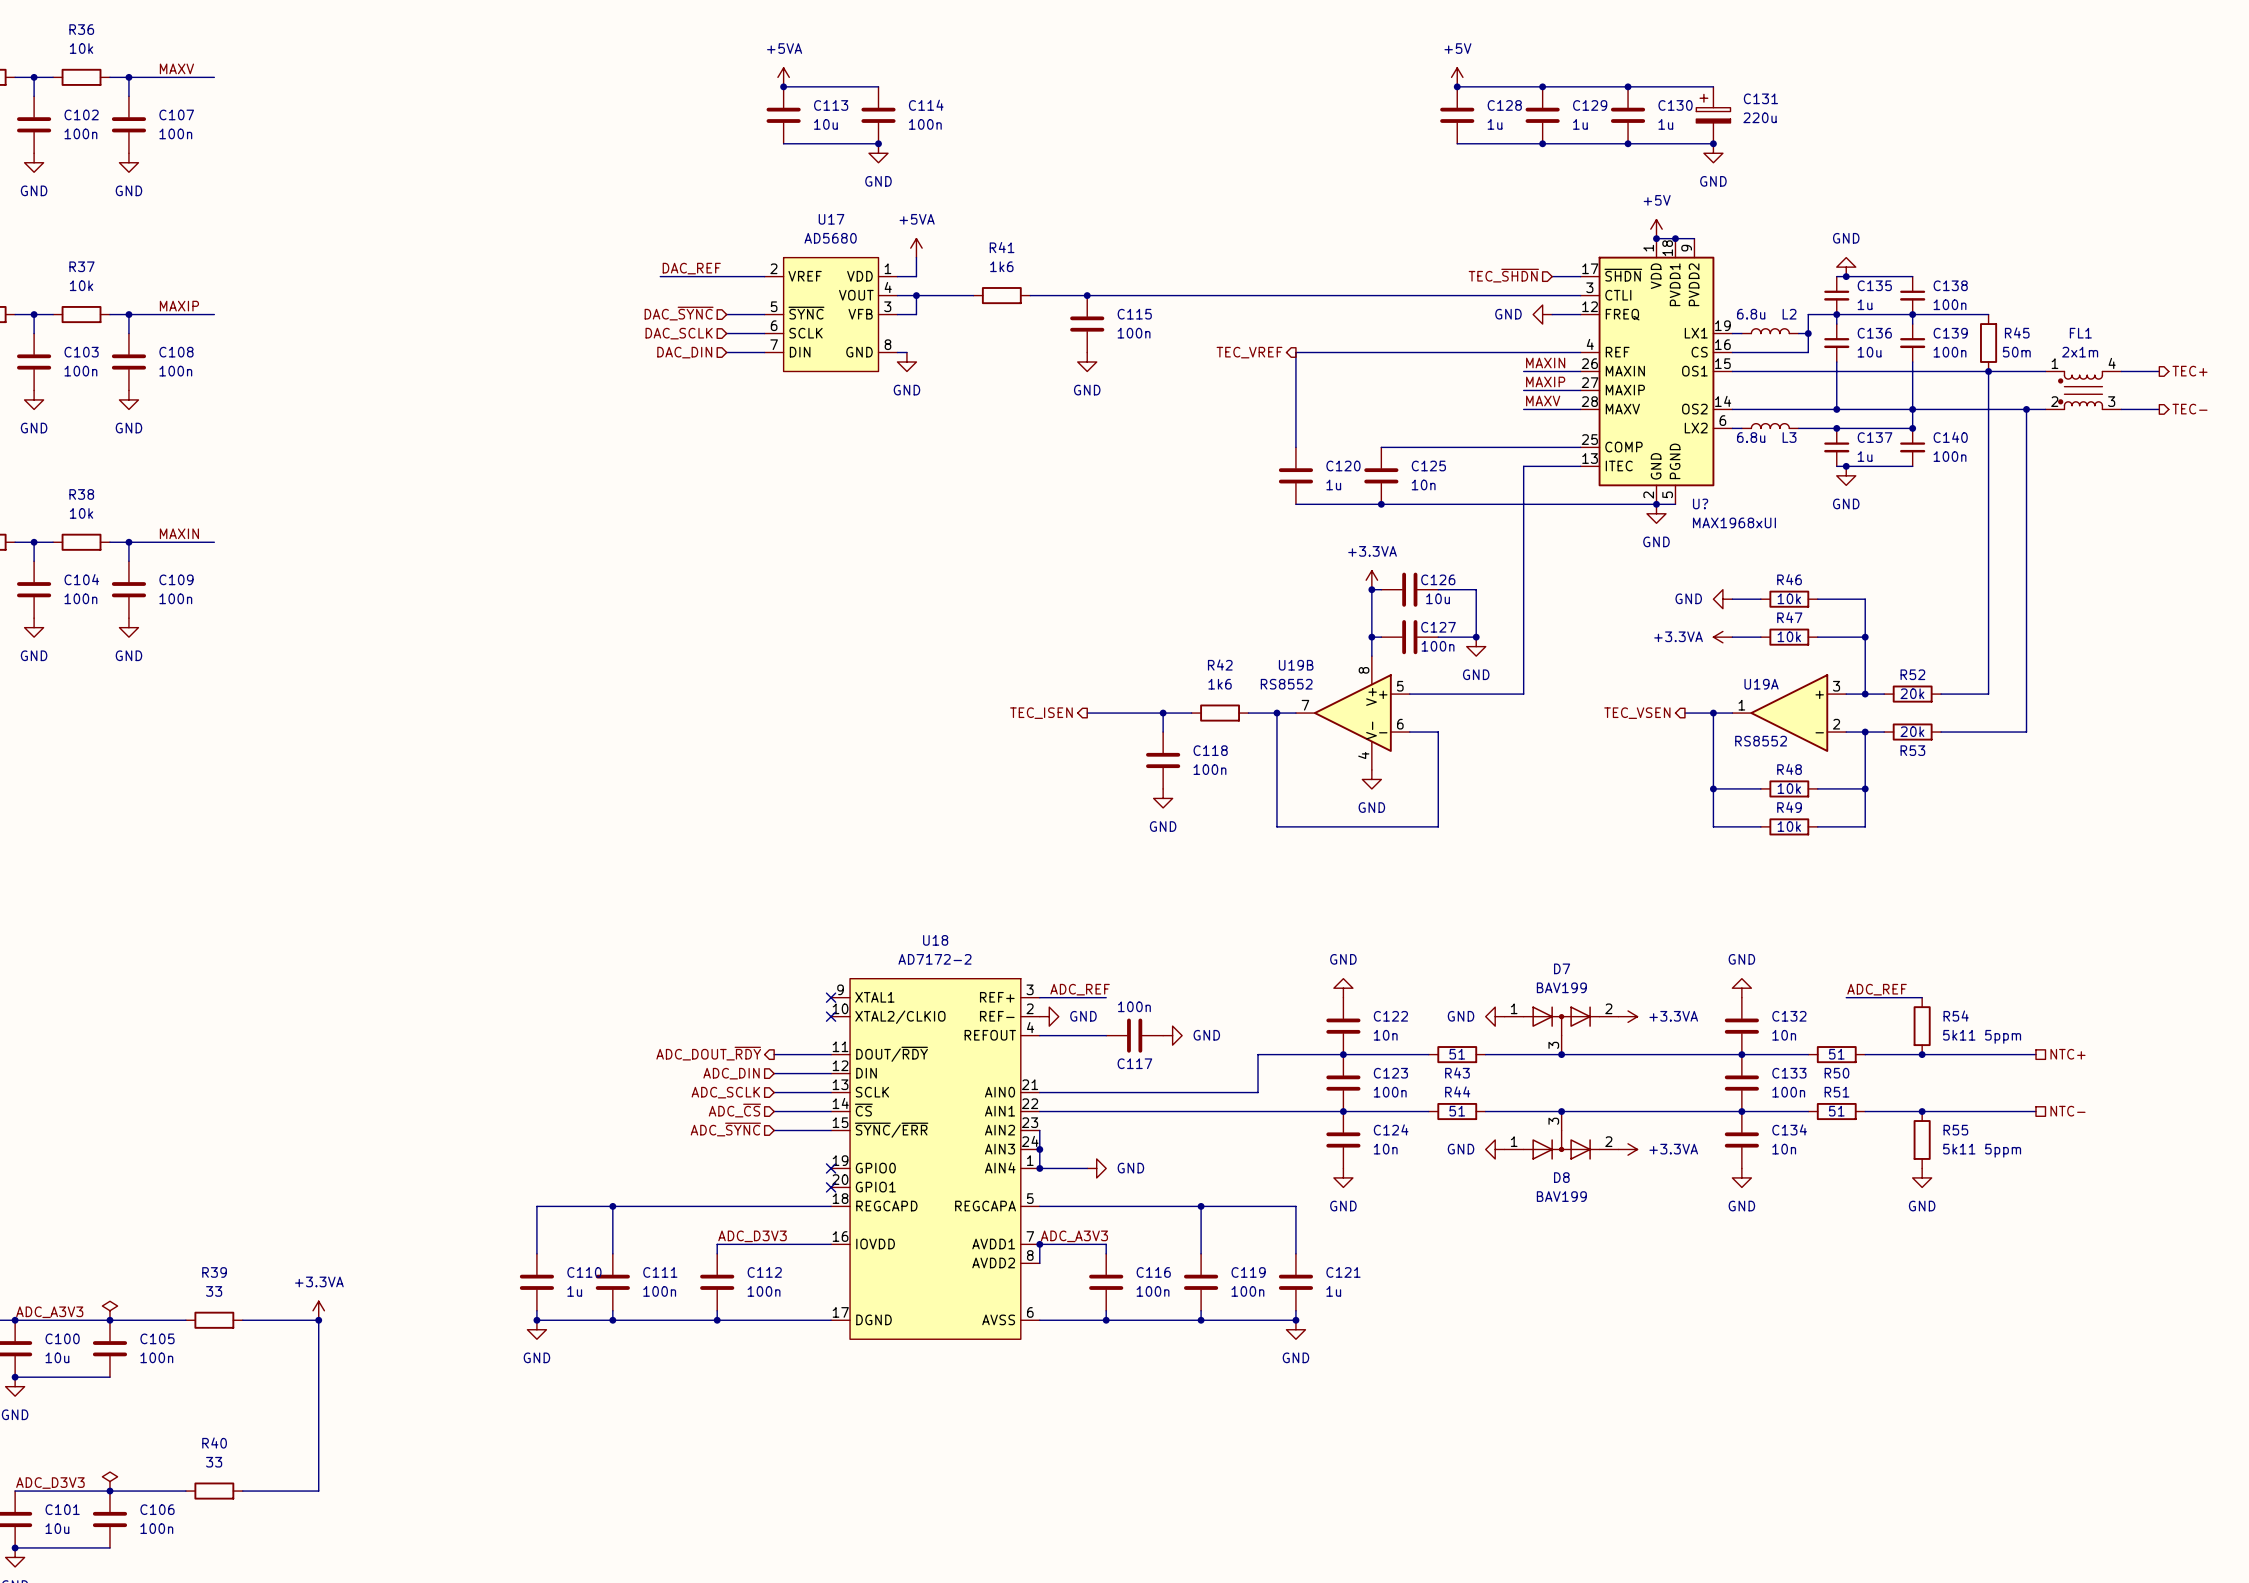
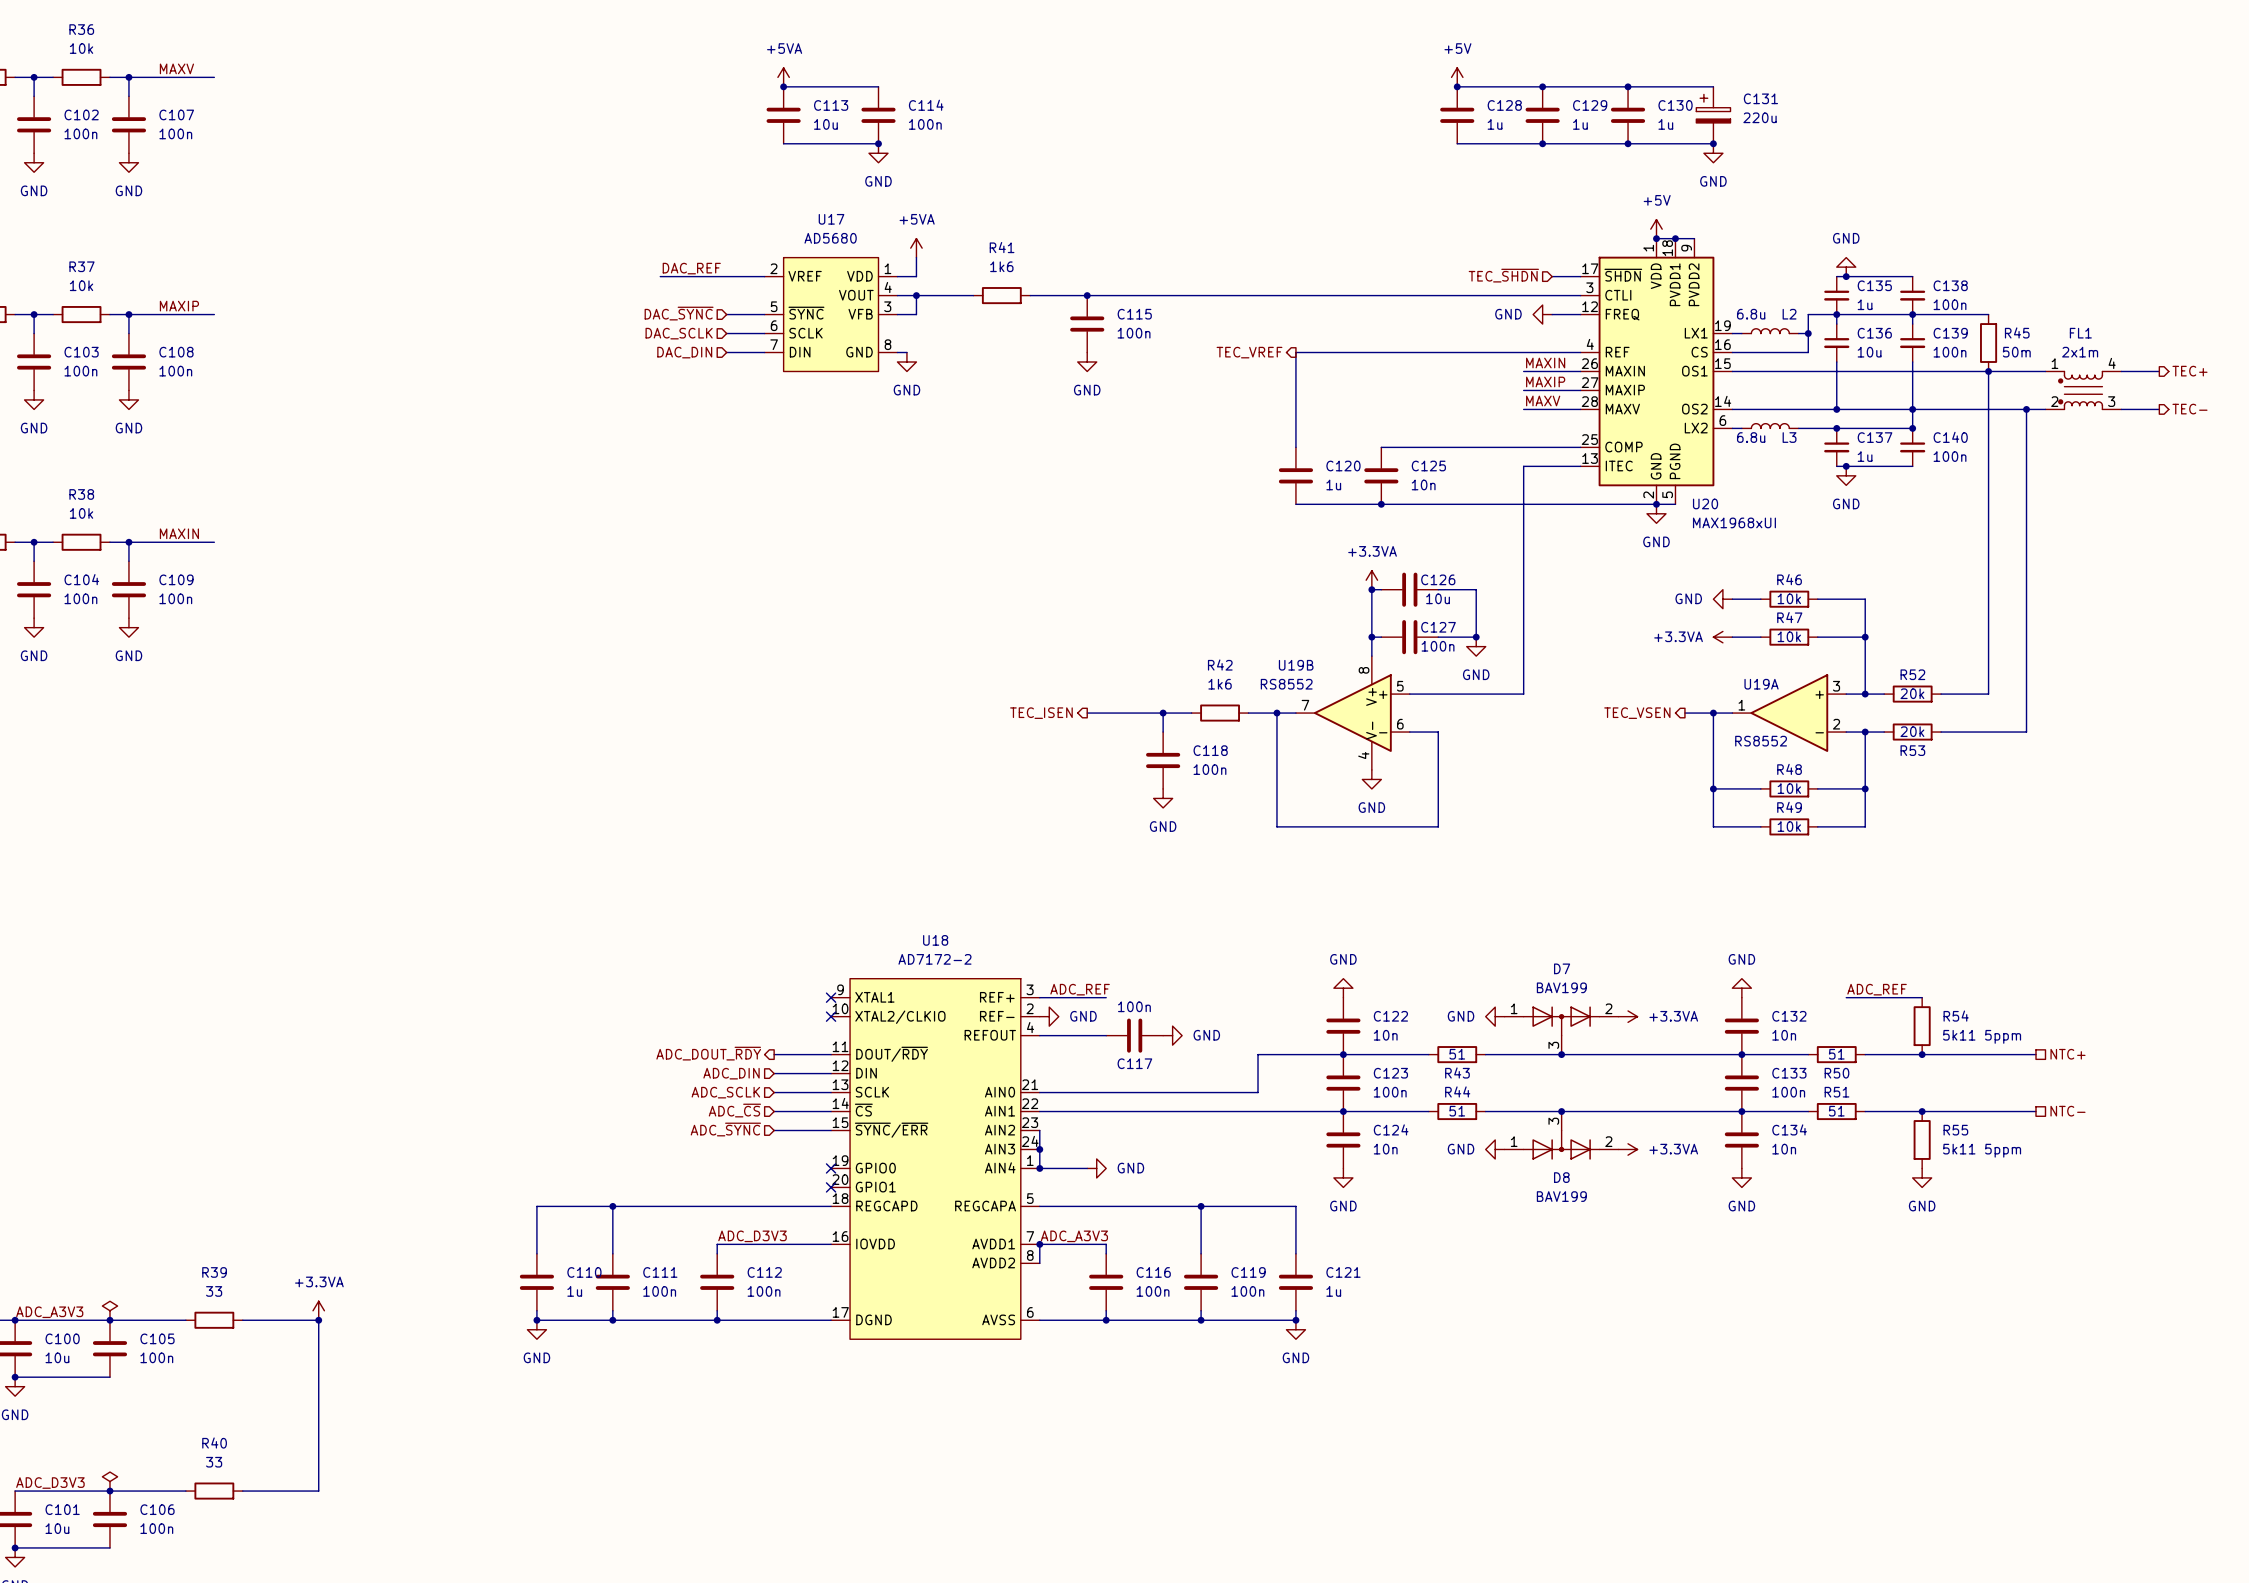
U? name: U? (1700, 503) -> U20 (1705, 503)

